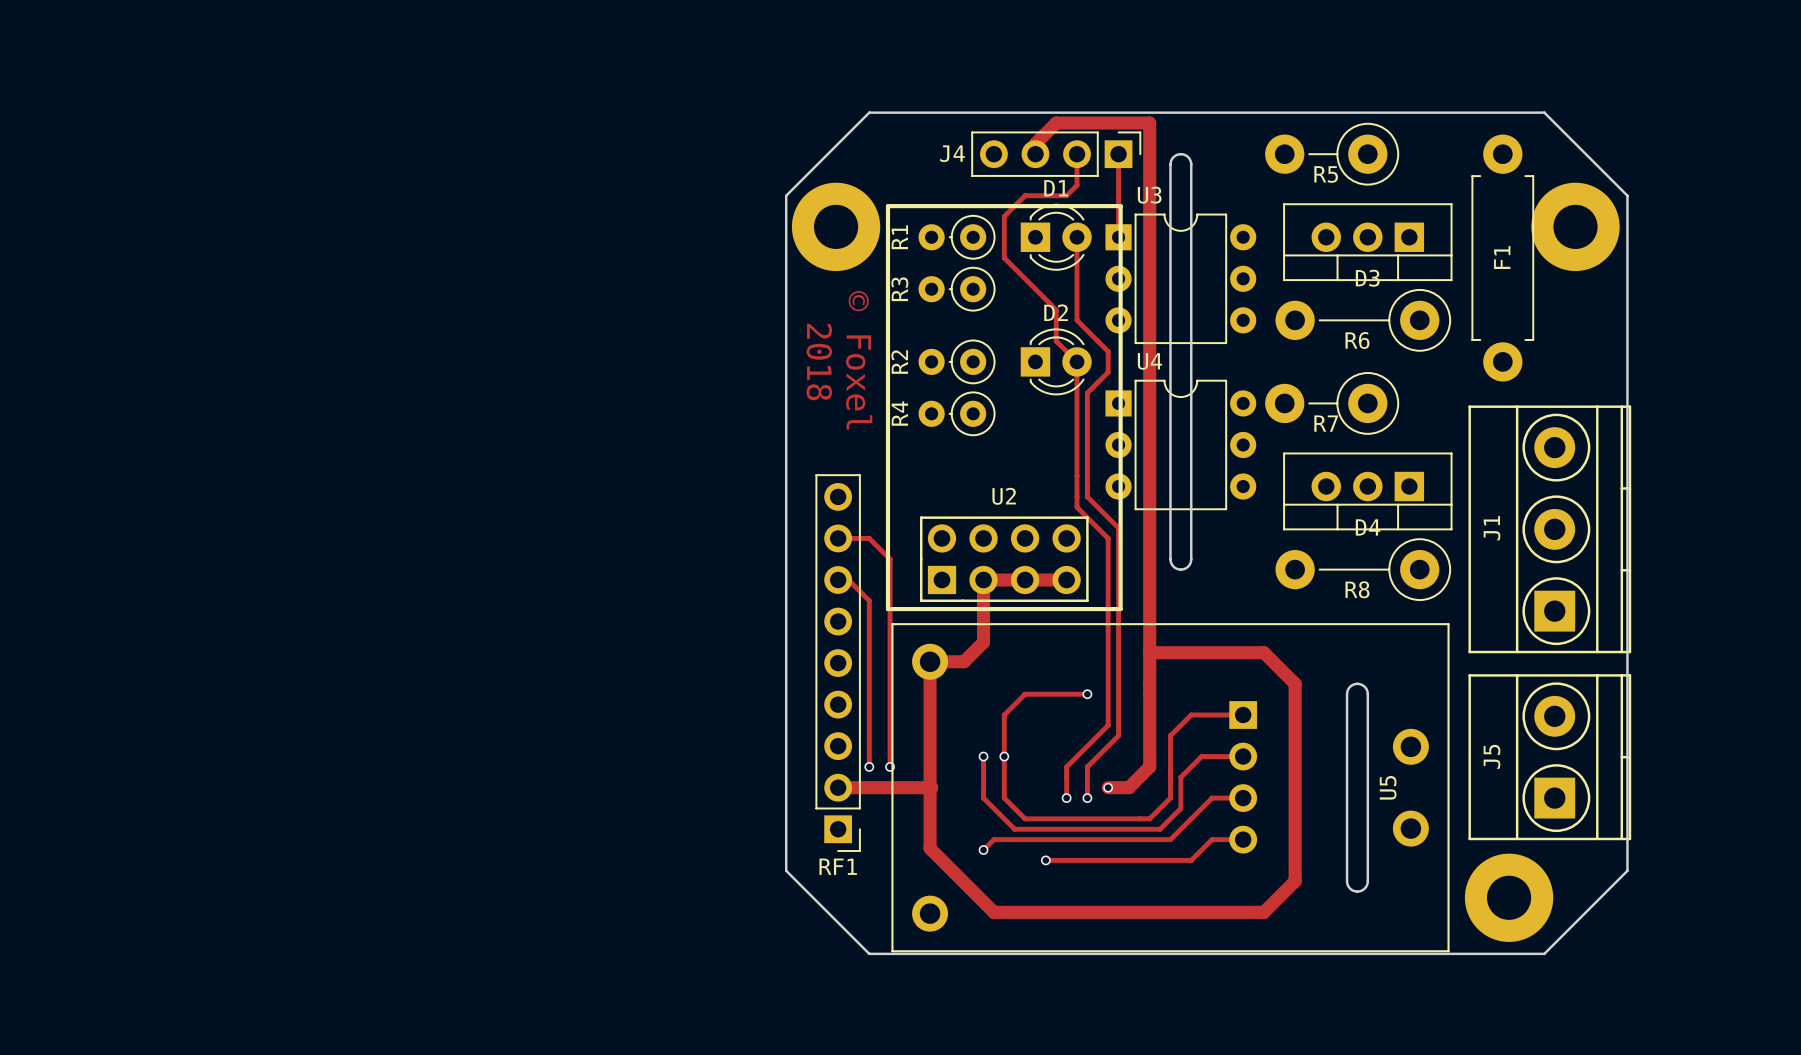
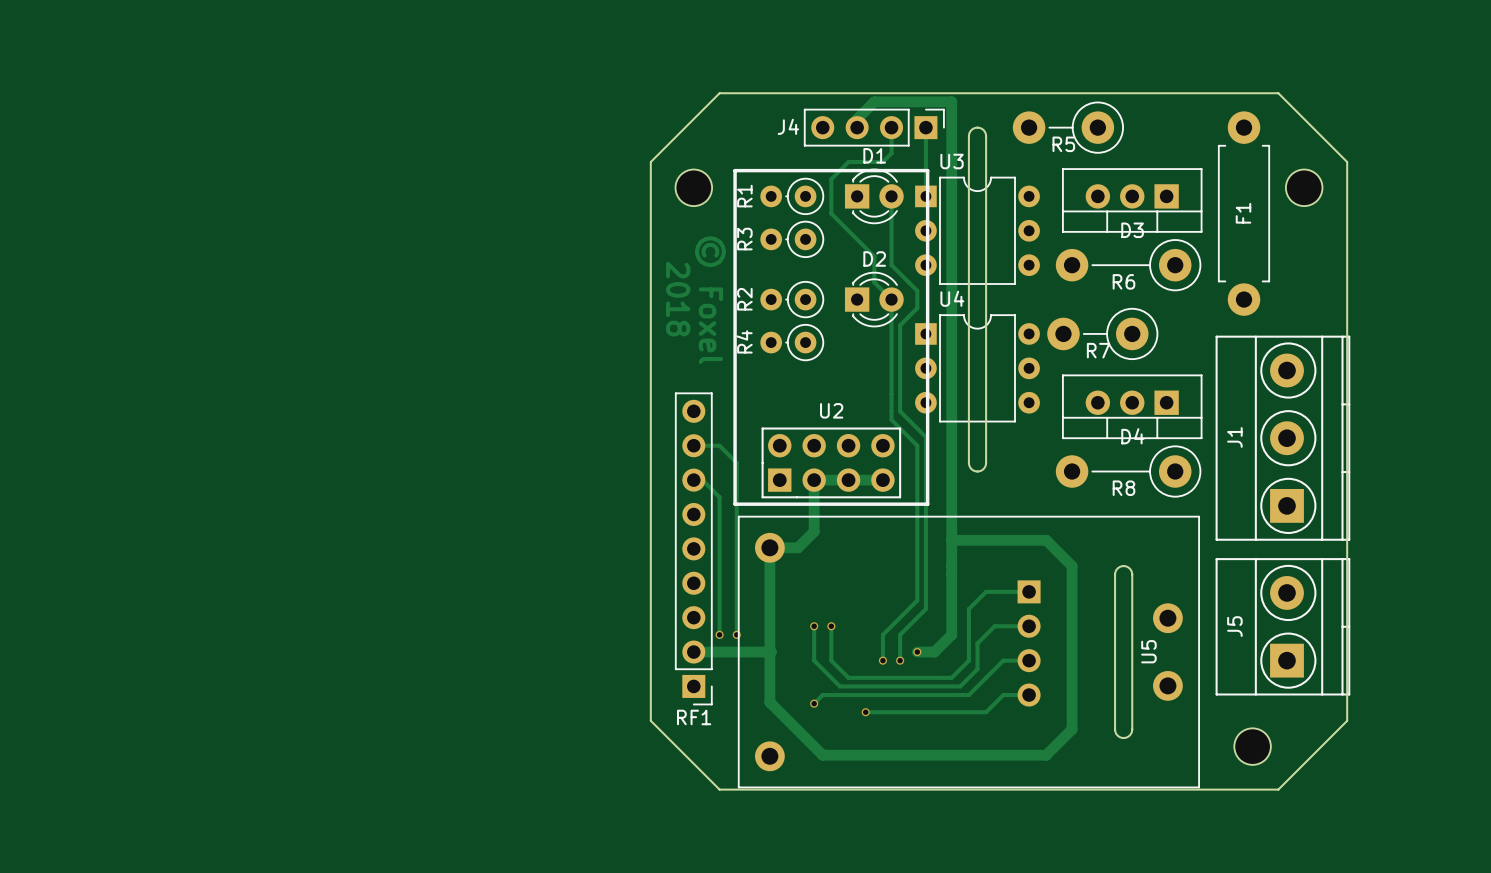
R5 position: (1332, 154) -> (1068, 127)
part footprint: [791, 182, 881, 272] -> [675, 169, 713, 207]
part footprint: [1531, 182, 1620, 272] -> [1285, 169, 1323, 207]
track: (1087, 694) (1025, 694) (1004, 715) (1004, 756) -> none
via: (1087, 694) -> none
part footprint: [1464, 853, 1554, 942] -> [1234, 728, 1271, 765]

